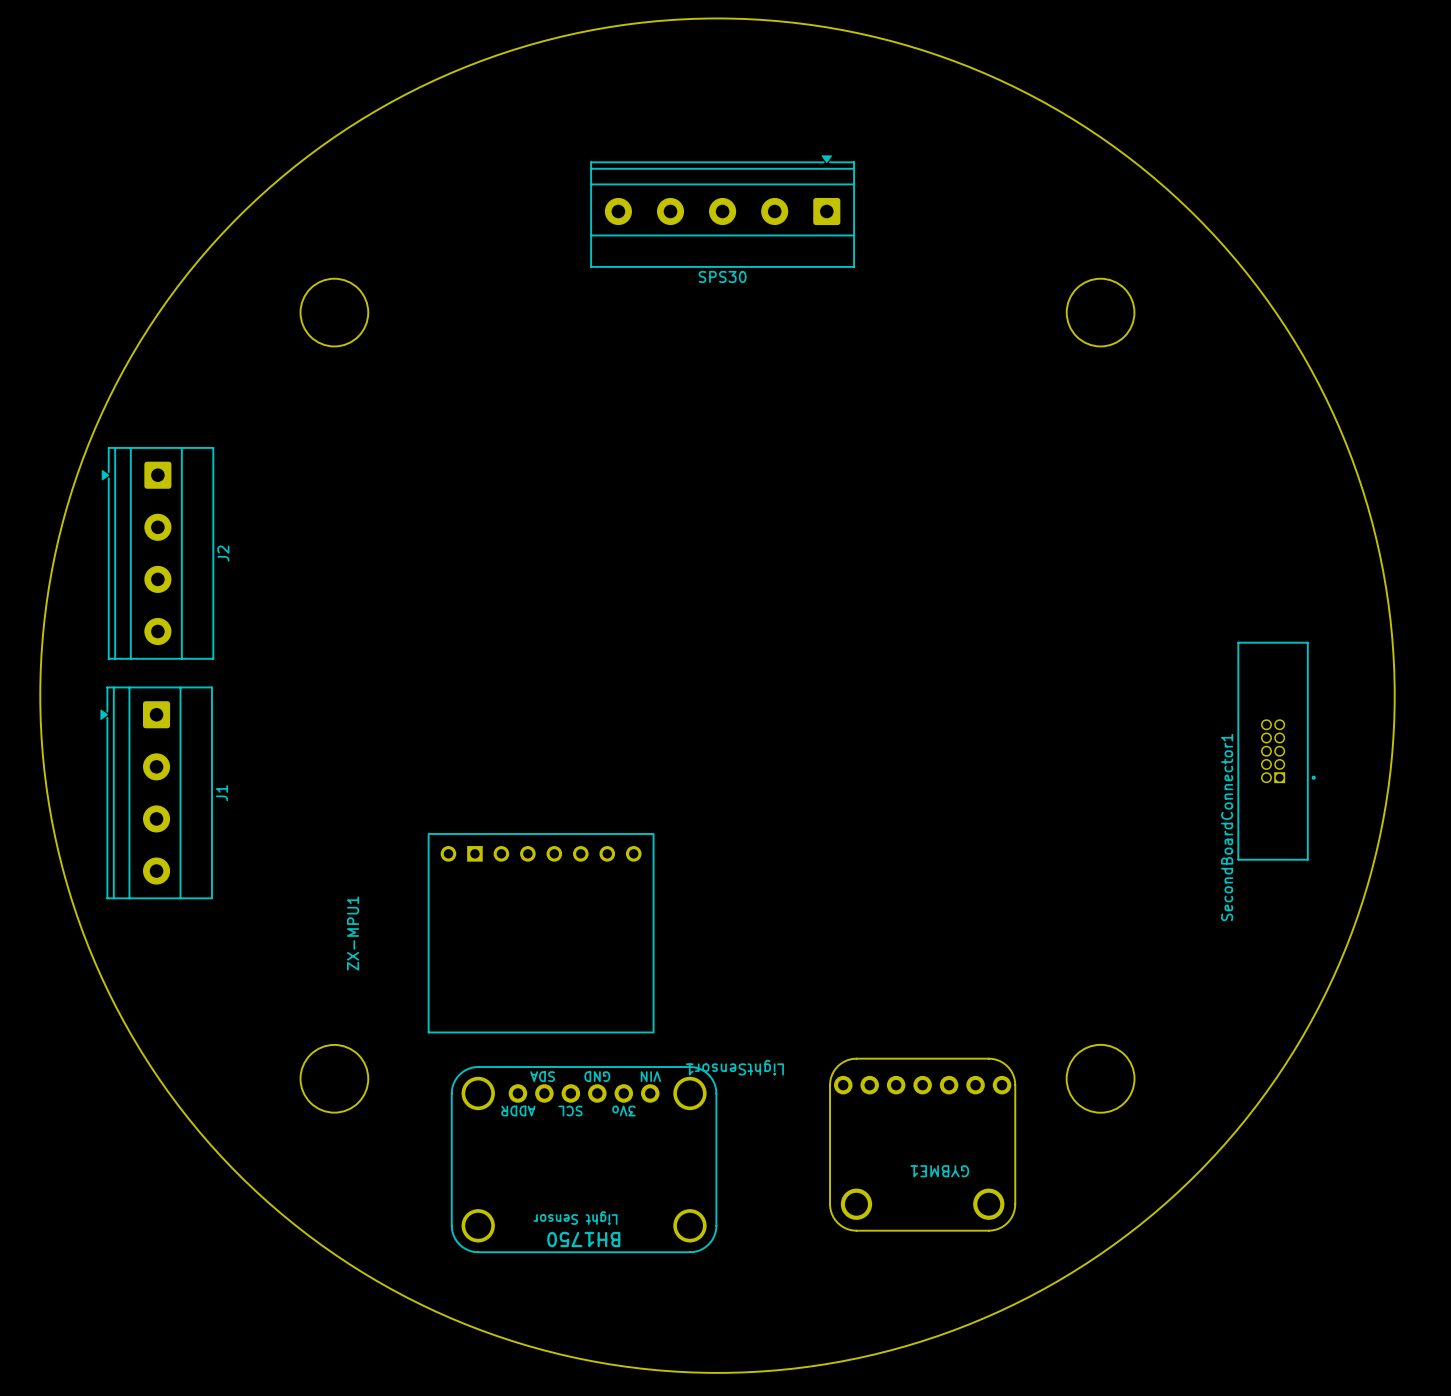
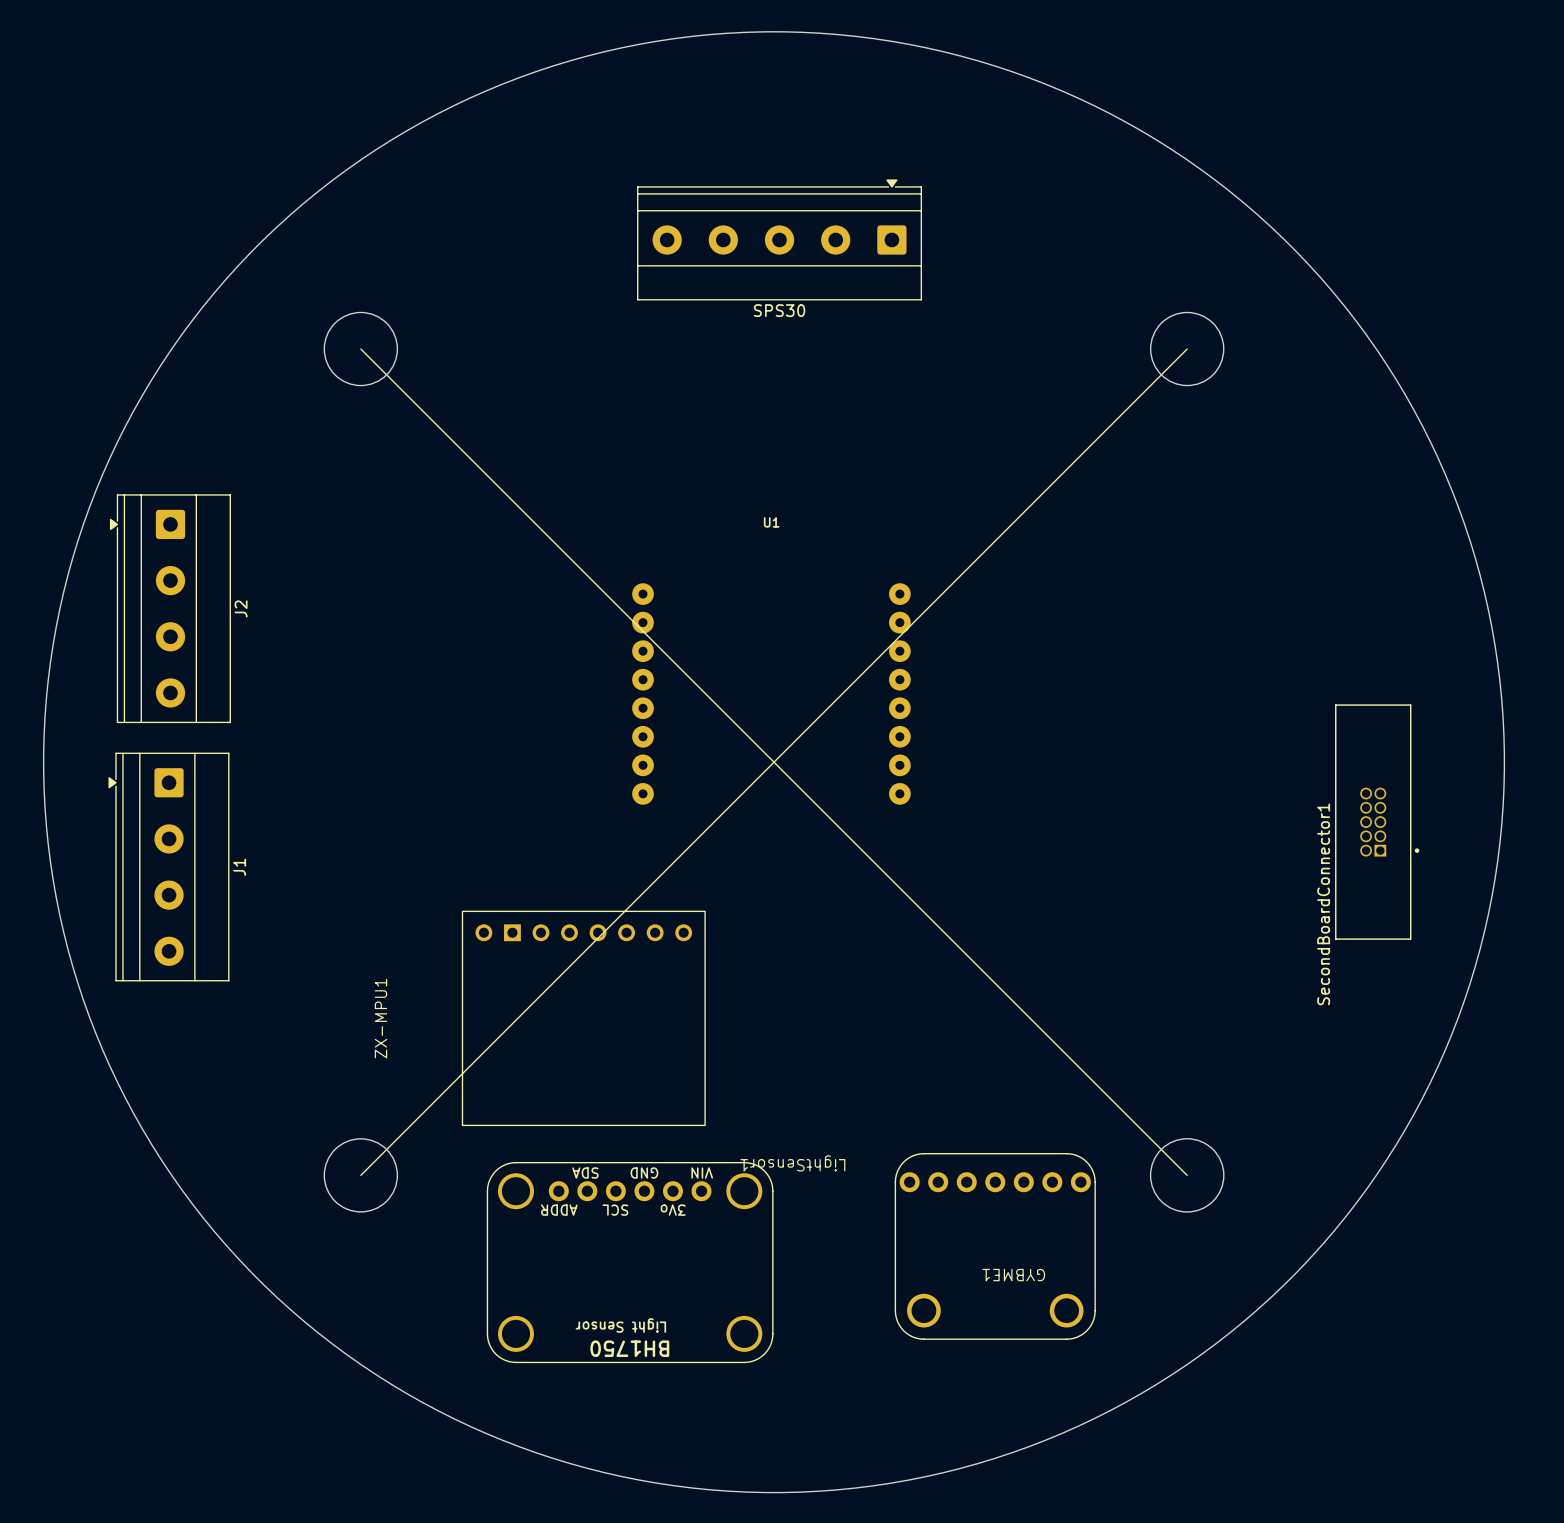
line: none -> (360, 349) (1187, 1175)
line: none -> (1187, 349) (360, 1175)
U1: none -> (771, 693)
GYBME1 footprint: [829, 1058, 1016, 1231] -> [895, 1153, 1096, 1340]

